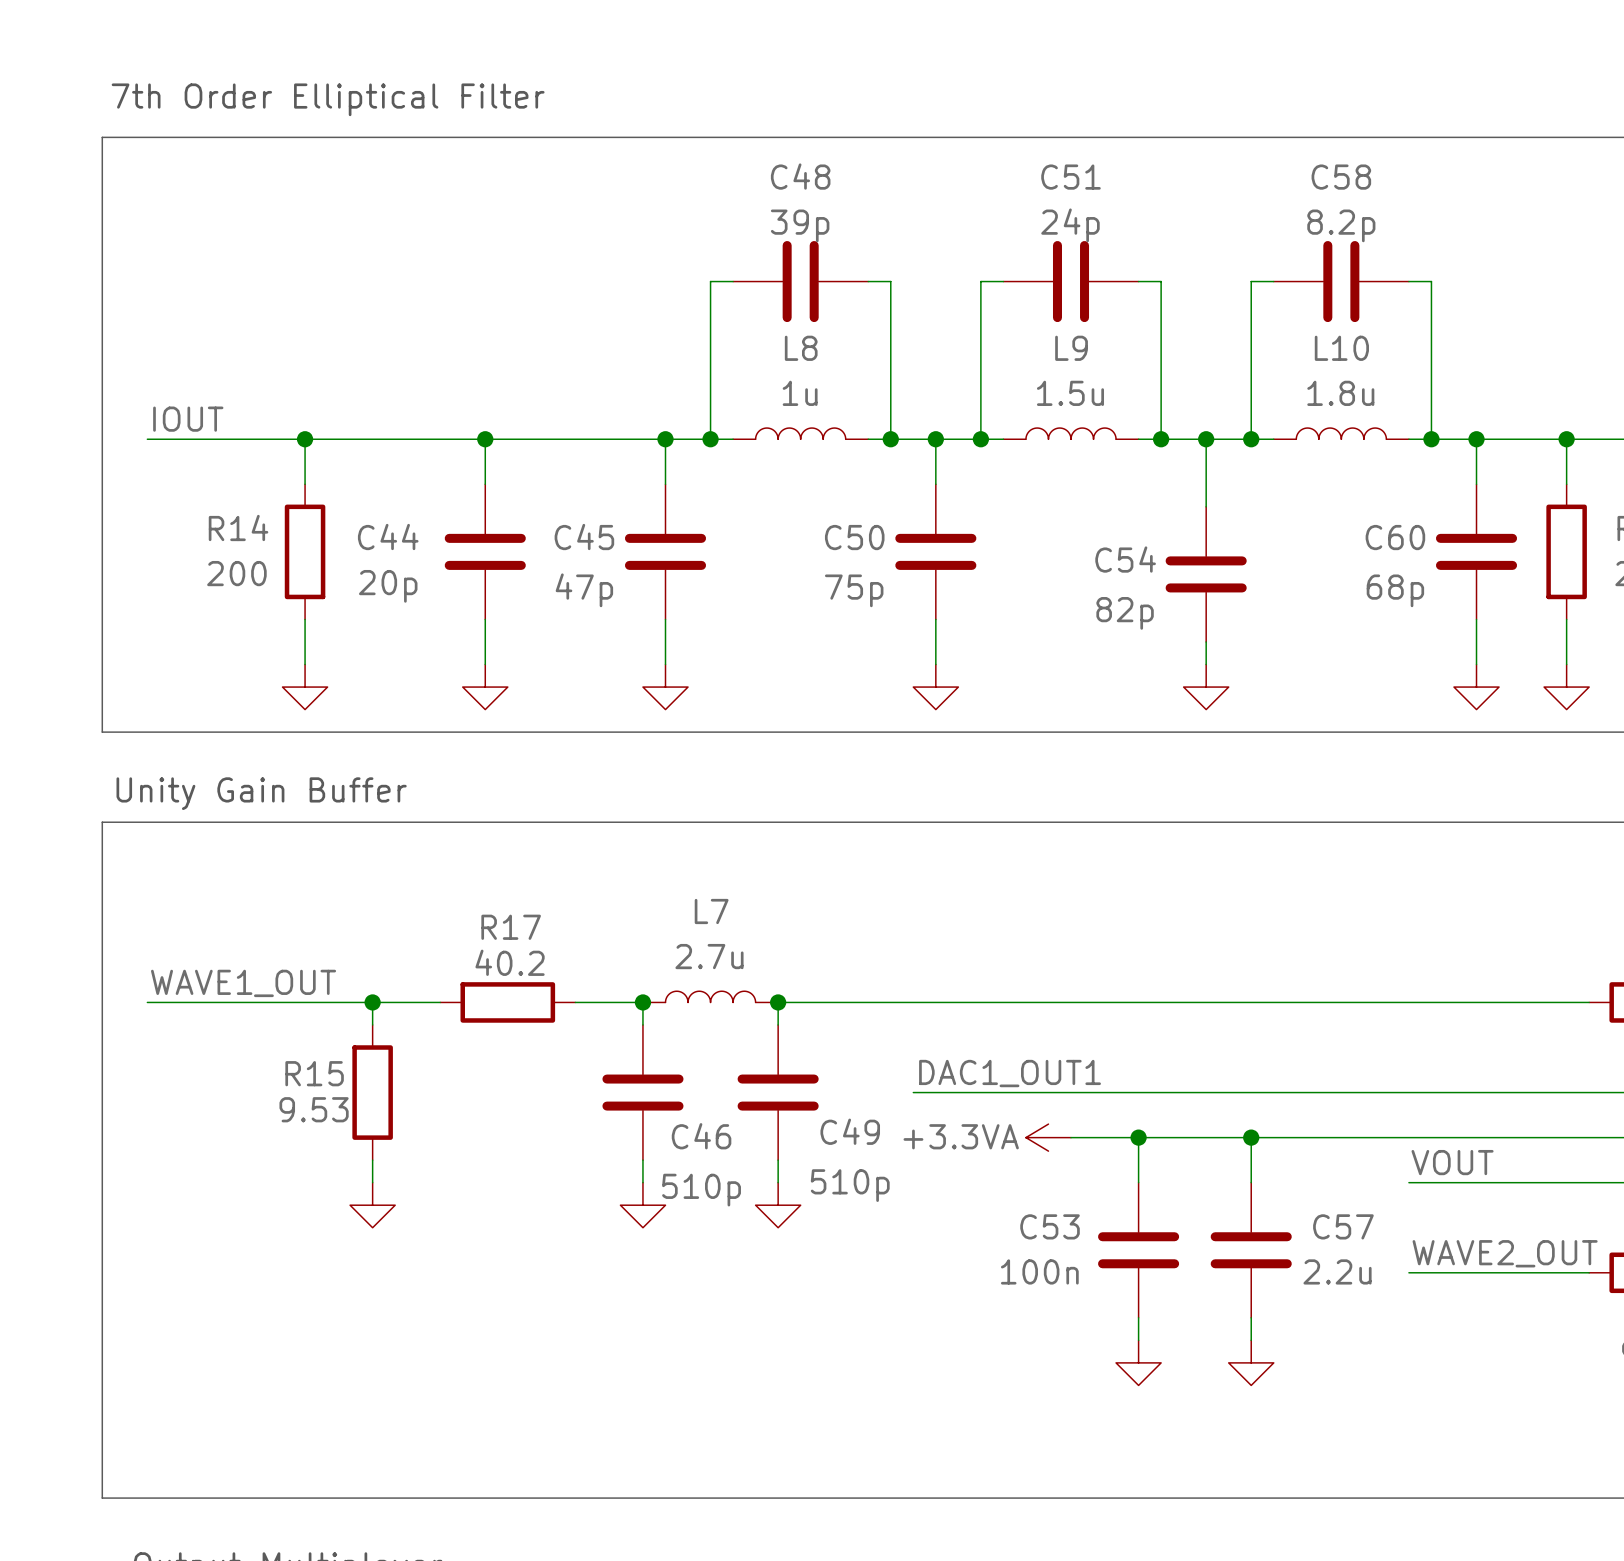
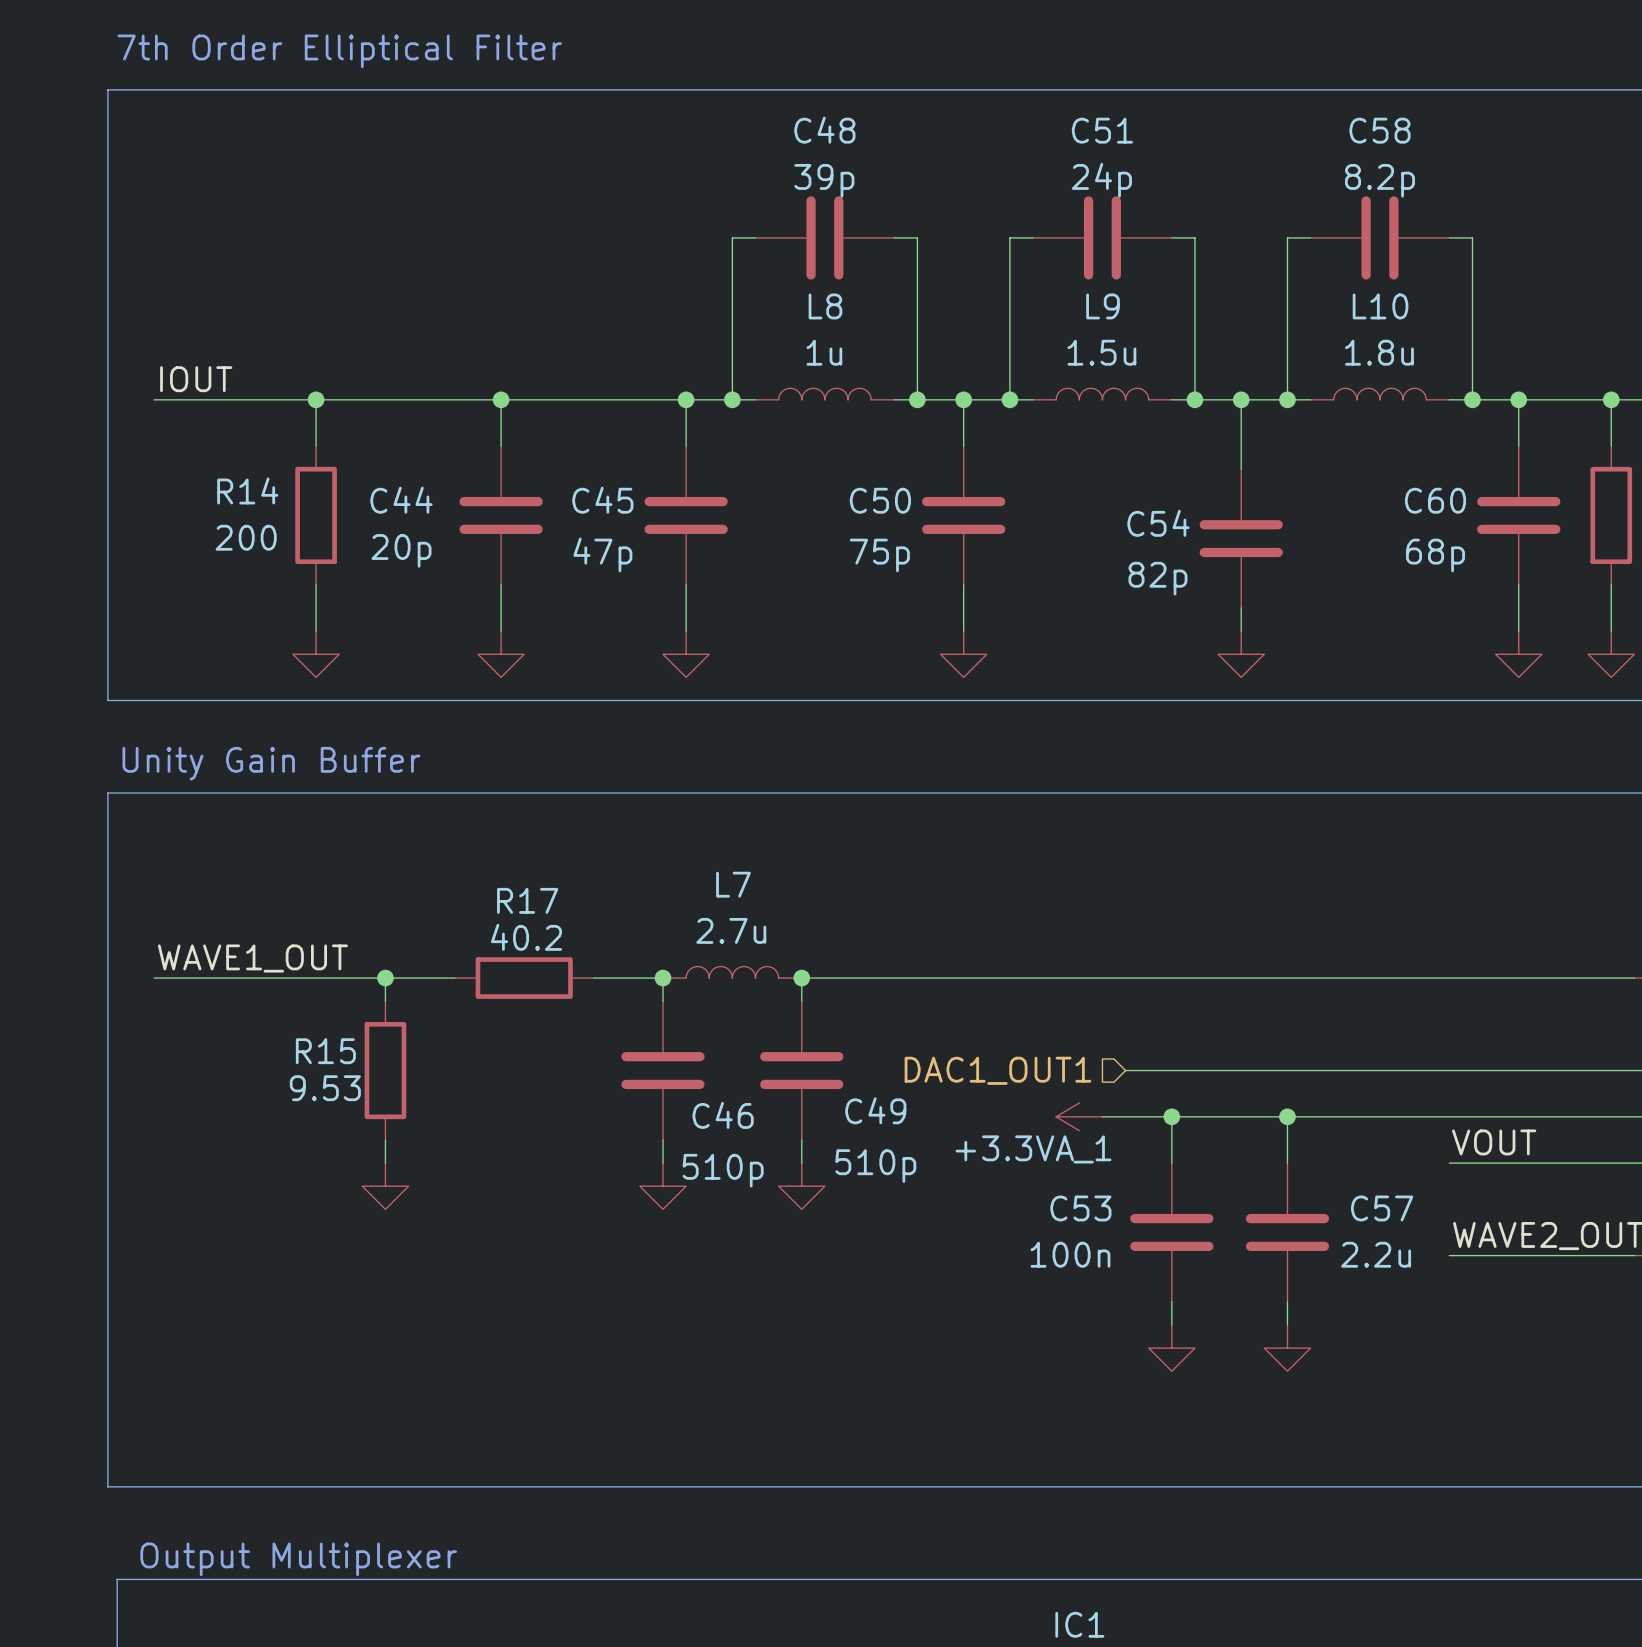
label: DAC1_OUT1 (1010, 1073) -> none
wire: (913, 1092) (1093, 1092) -> none
hierarchical label: none -> DAC1_OUT1 (998, 1070)
power symbol: +3.3VA (1048, 1137) -> +3.3VA_1 (1079, 1116)

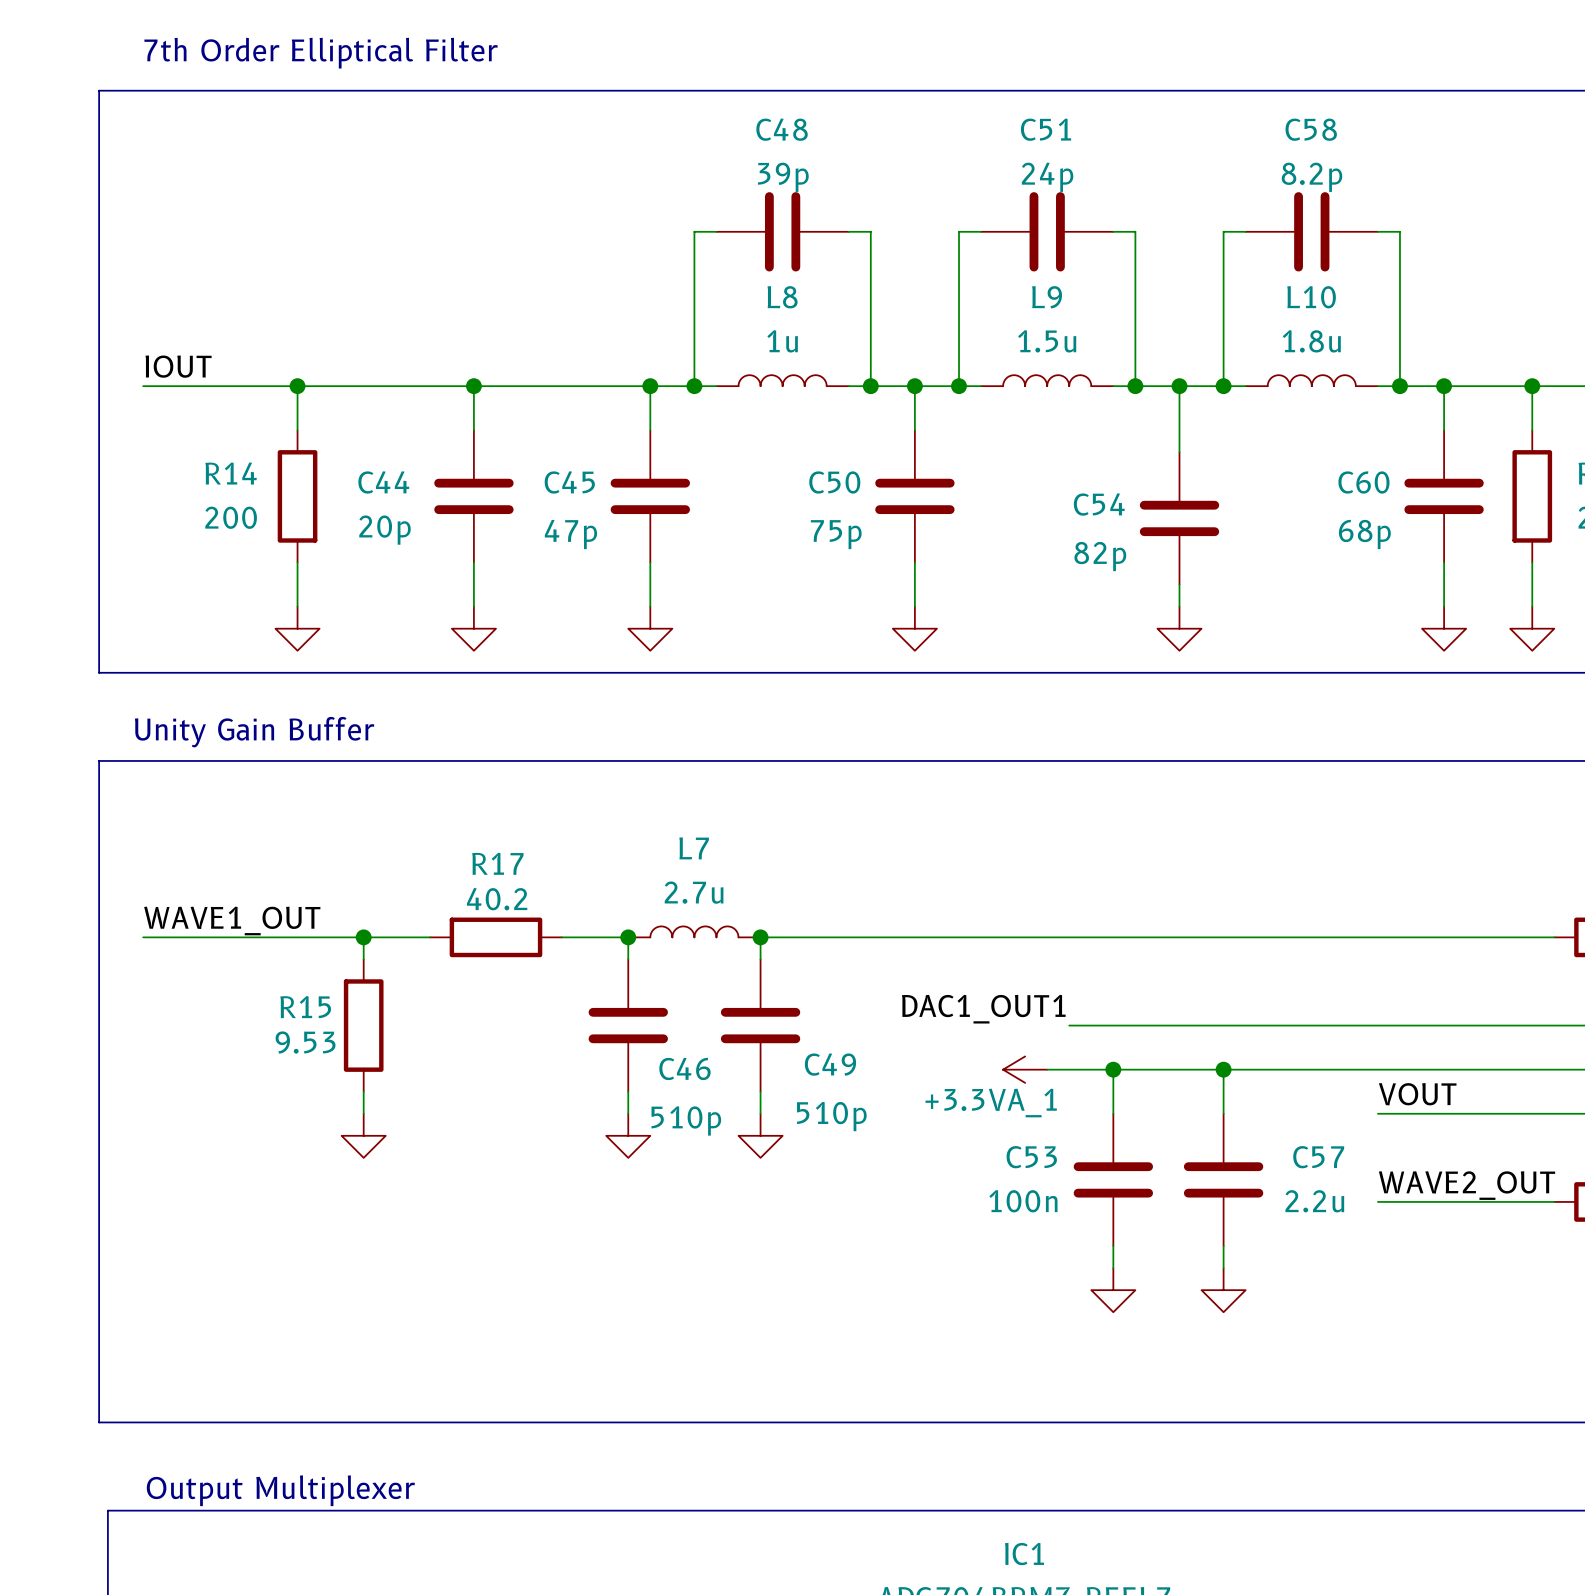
label: none -> DAC1_OUT1 (983, 1009)
hierarchical label: DAC1_OUT1 (998, 1070) -> none

